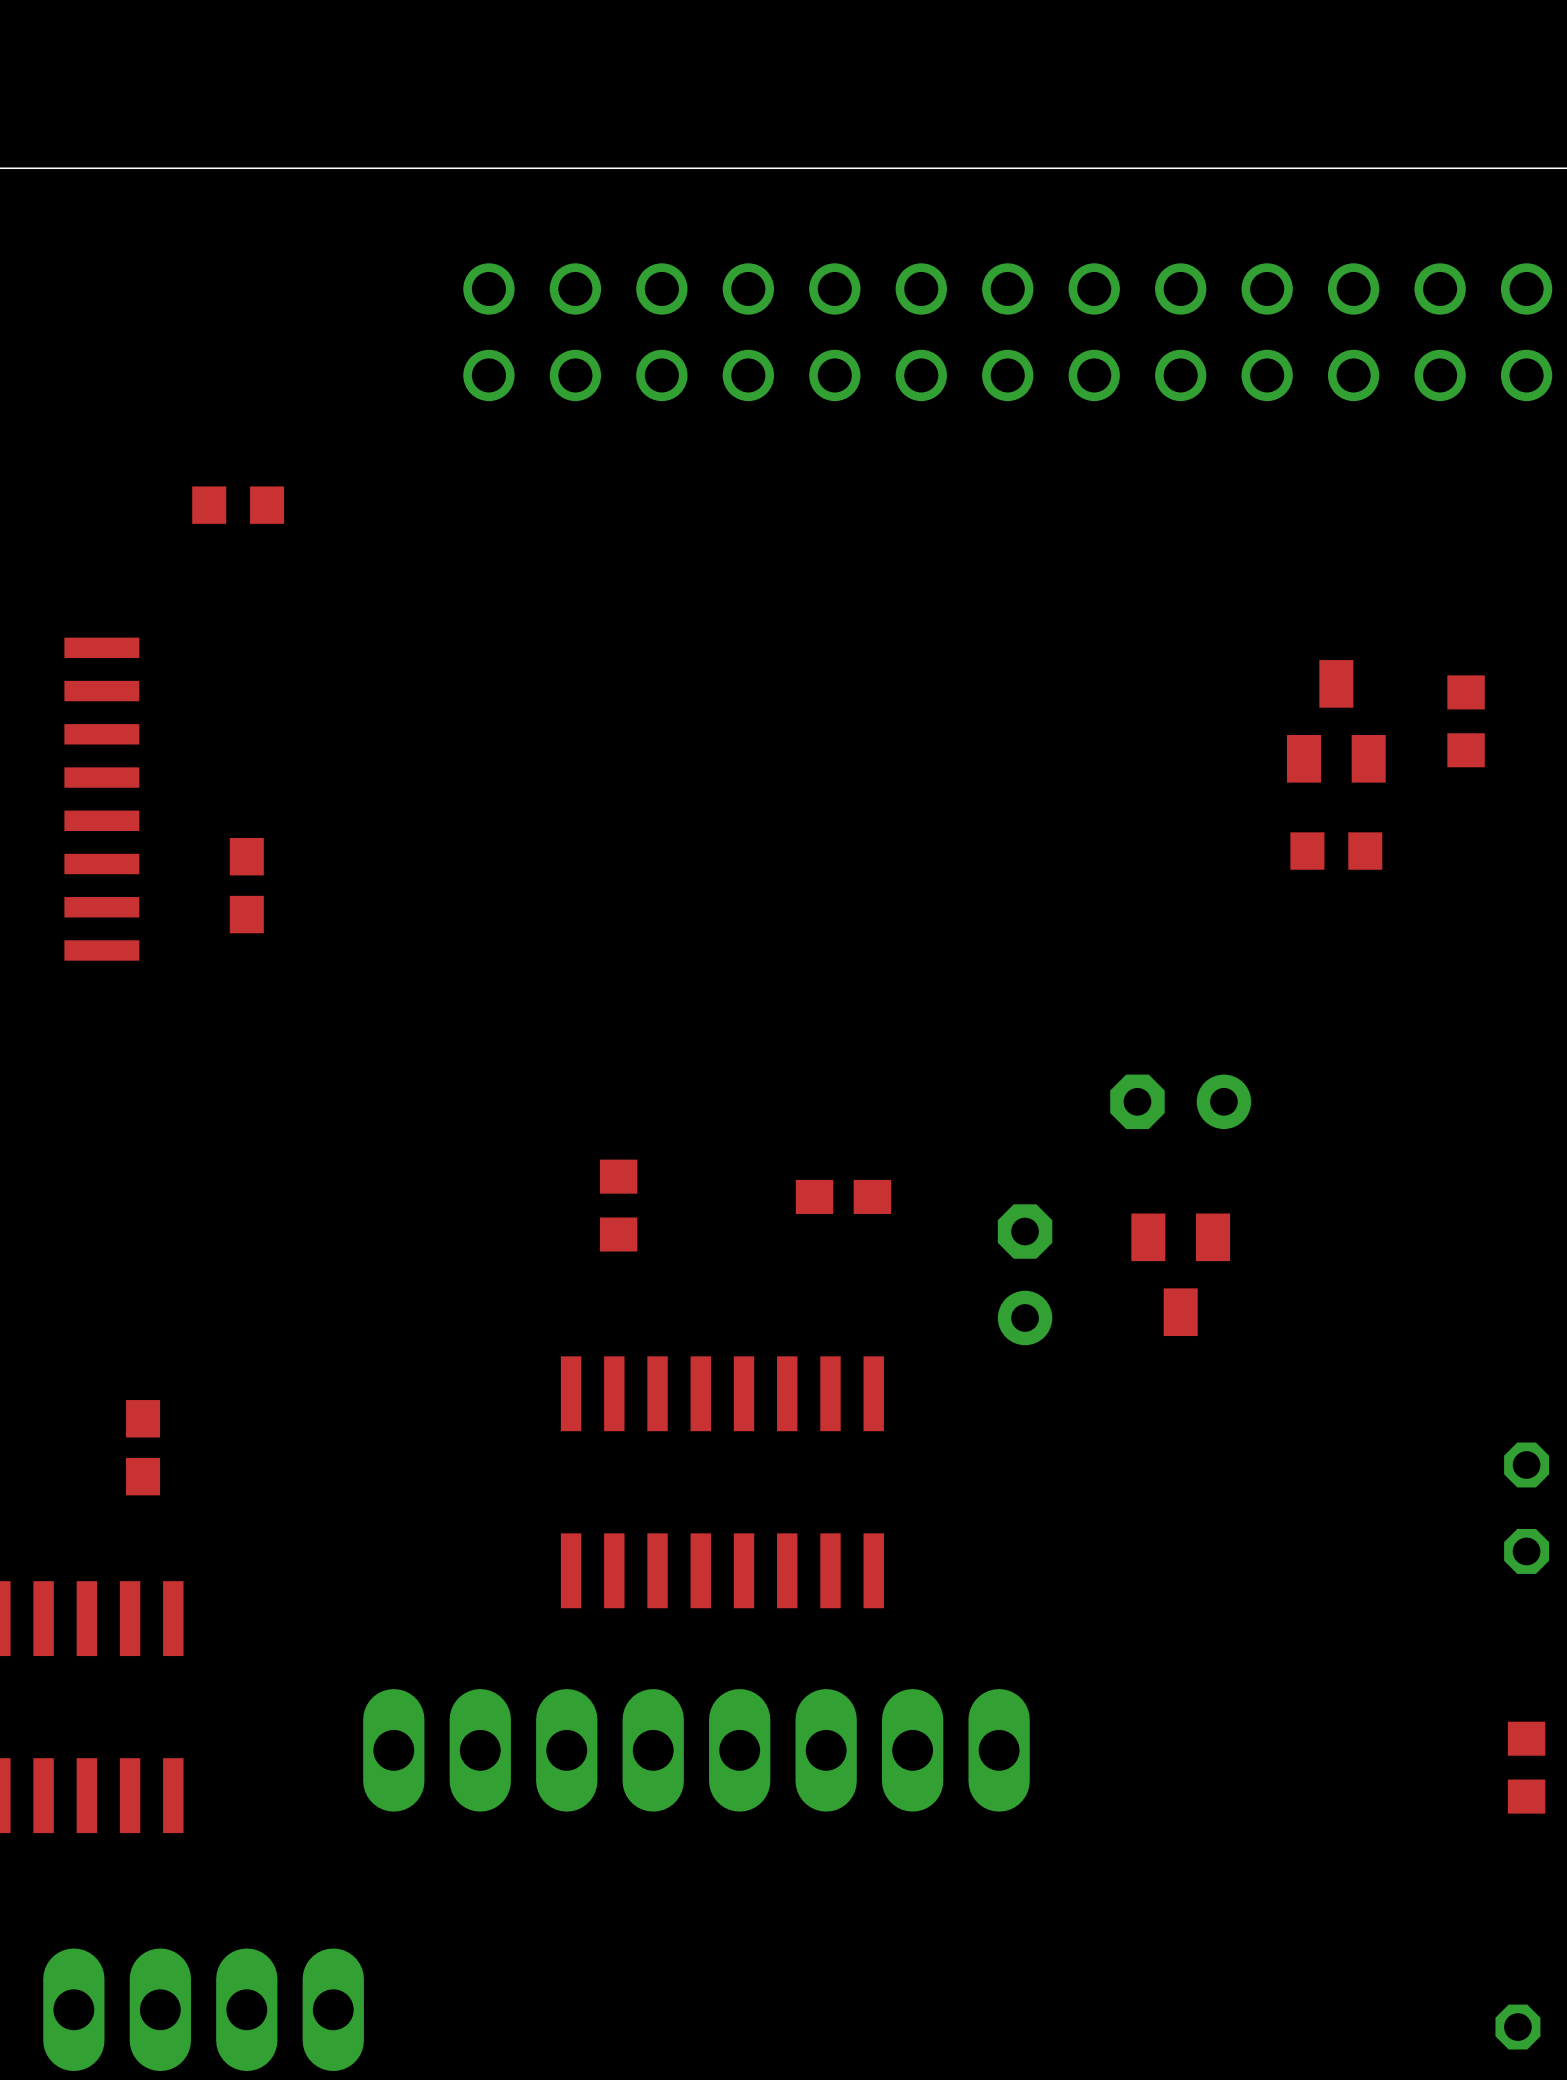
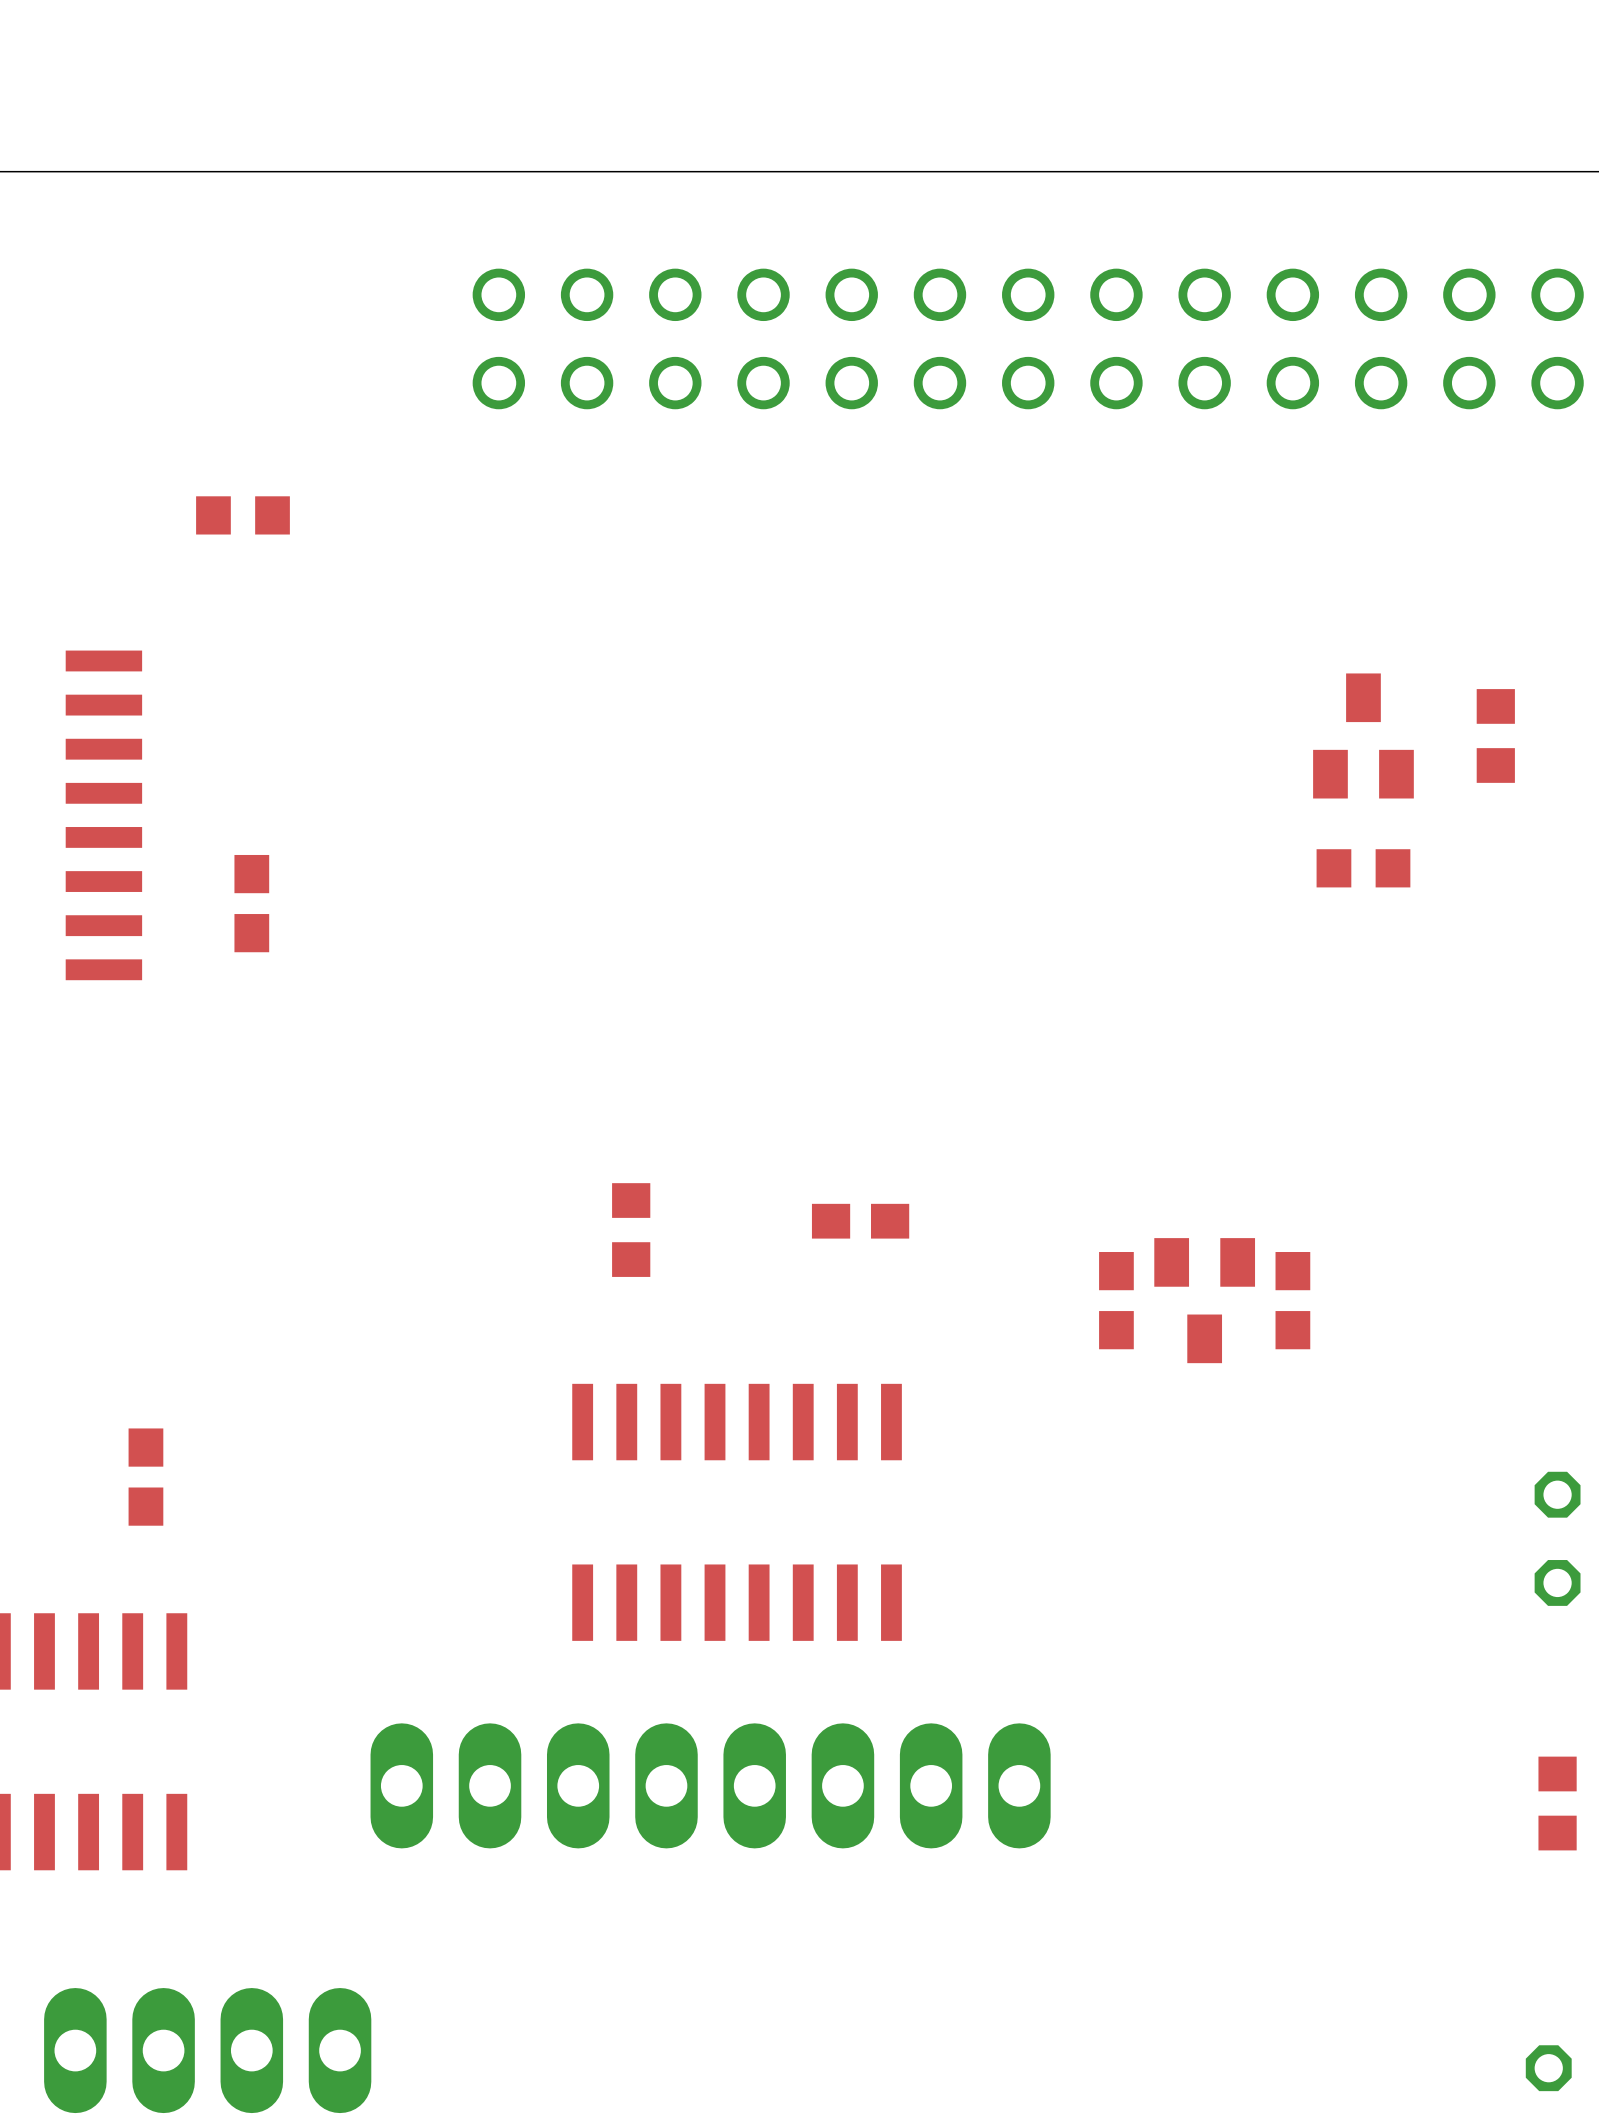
part: (1180, 1101) -> none
part: (1025, 1274) -> none
part: none -> (1116, 1300)
part: none -> (1292, 1300)

